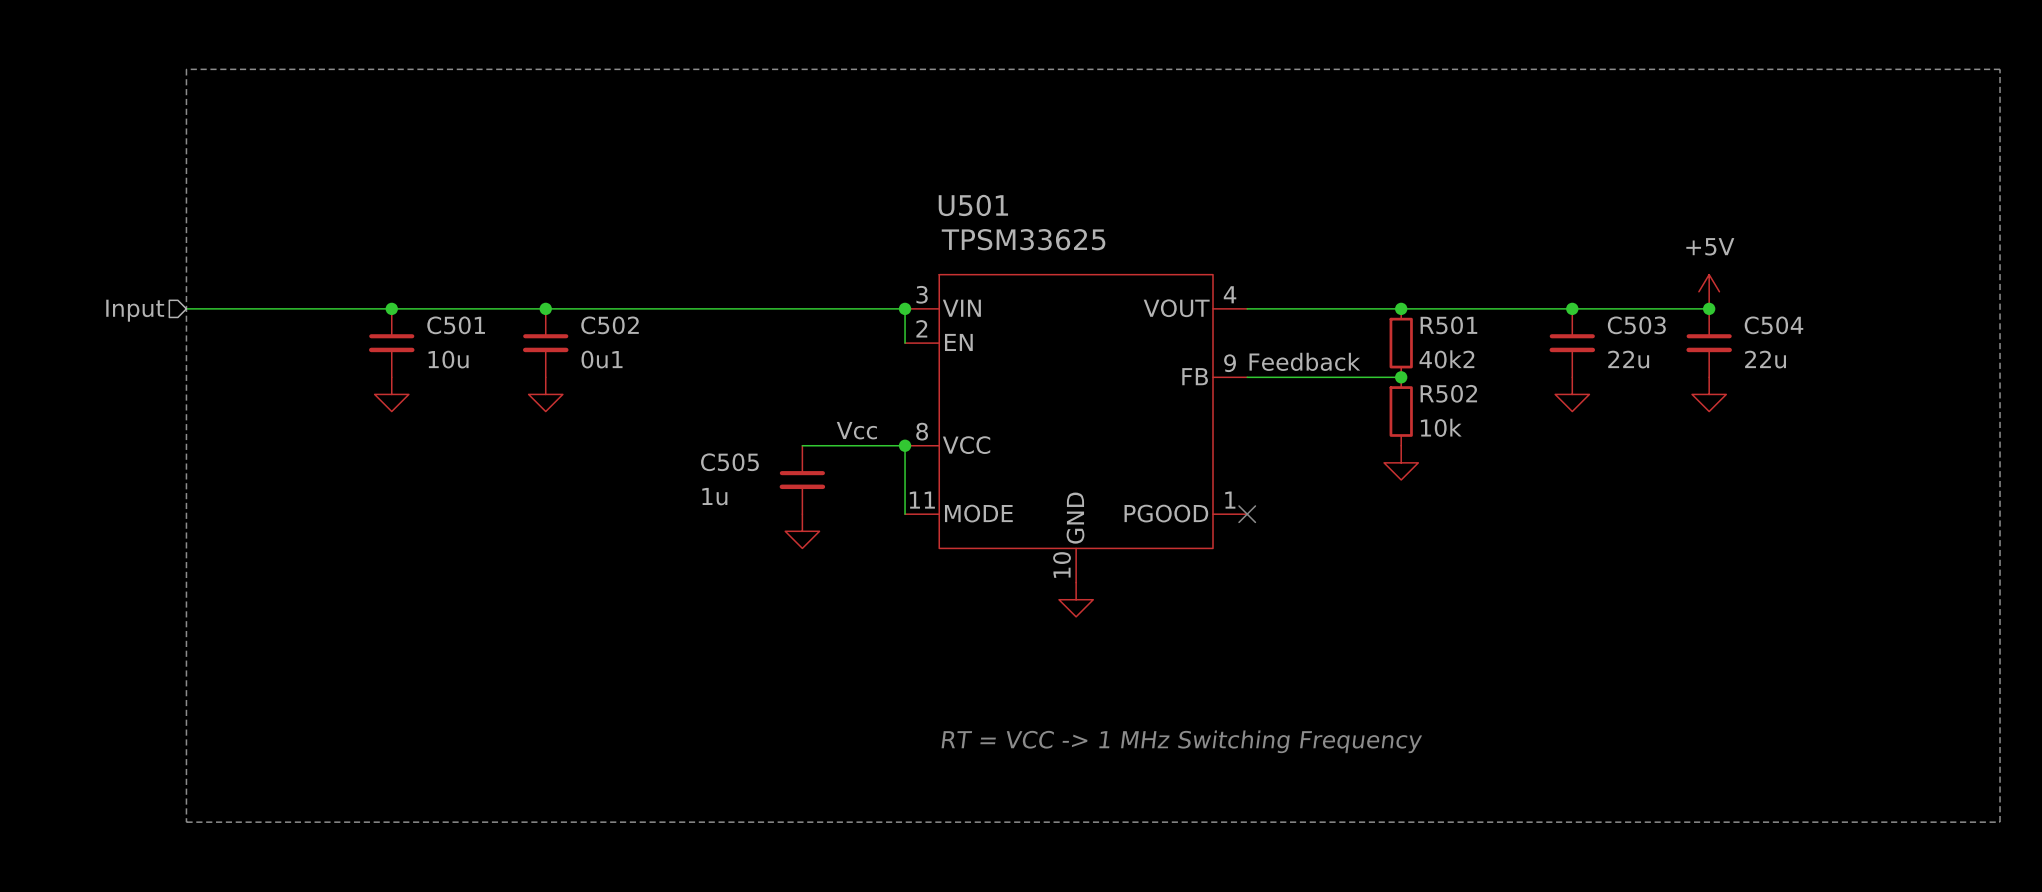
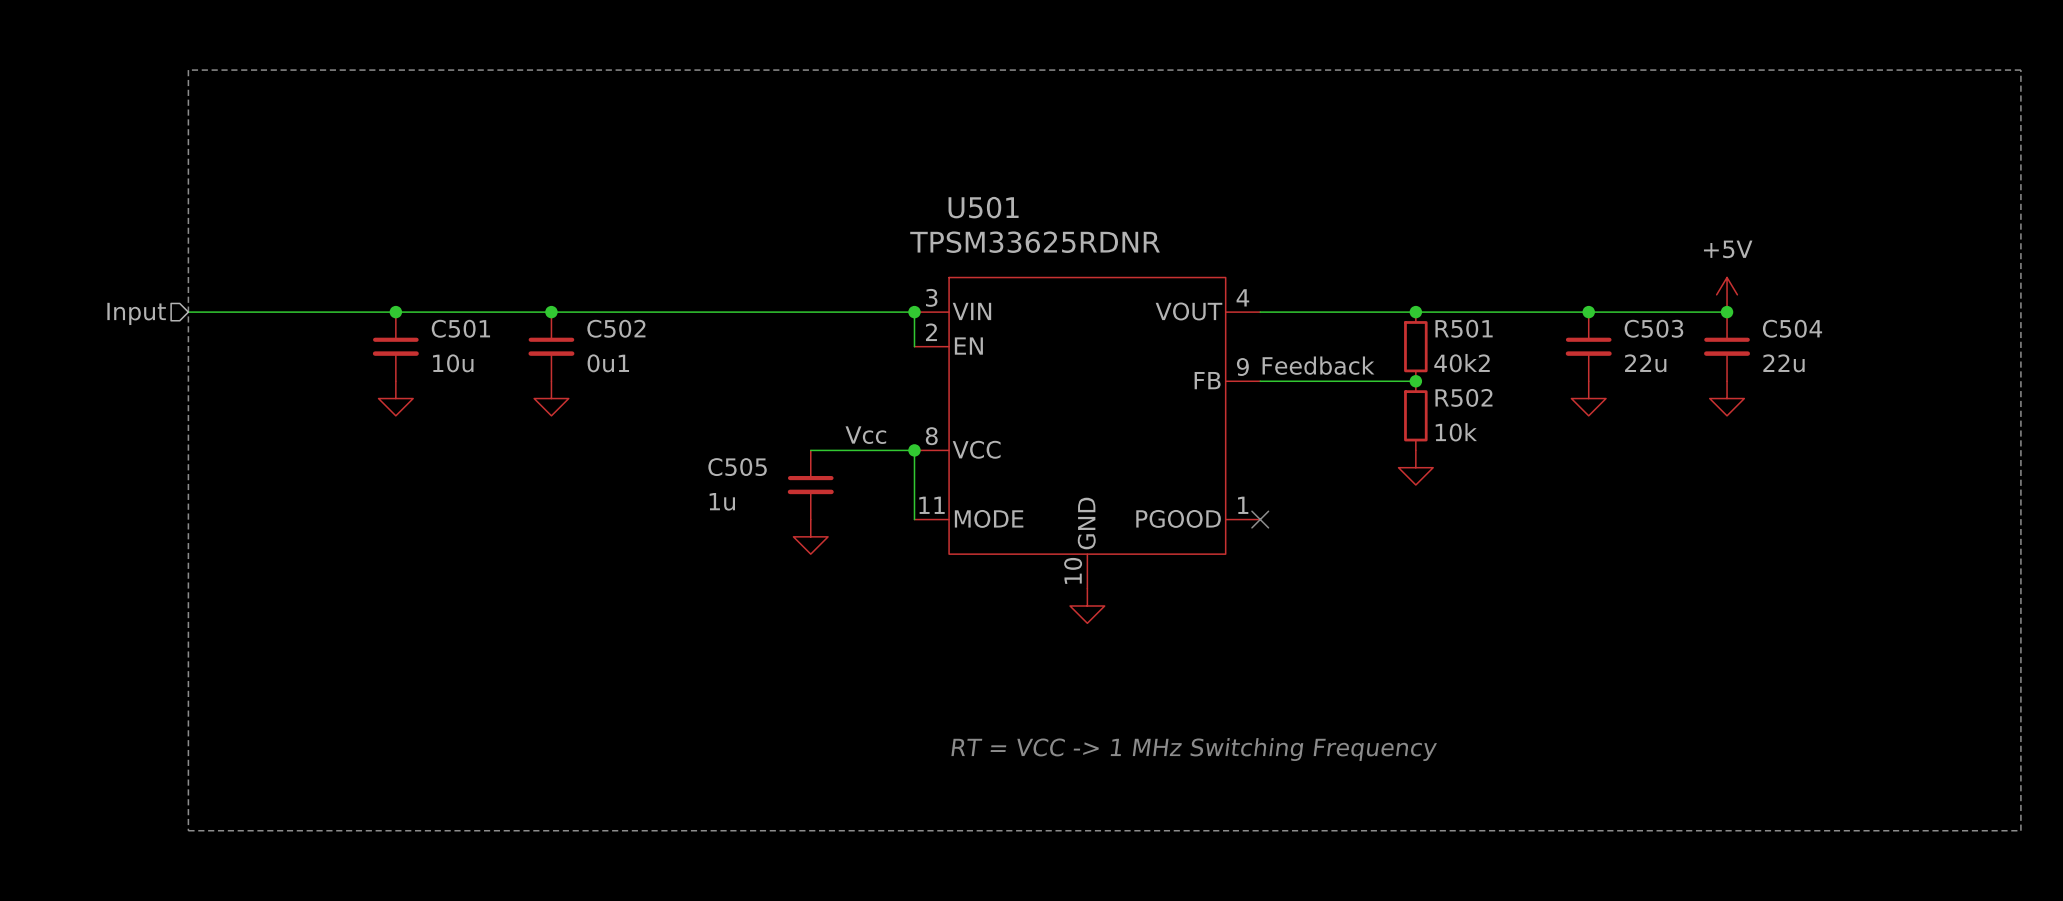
U501 value: TPSM33625 (1023, 239) -> TPSM33625RDNR (1035, 242)

